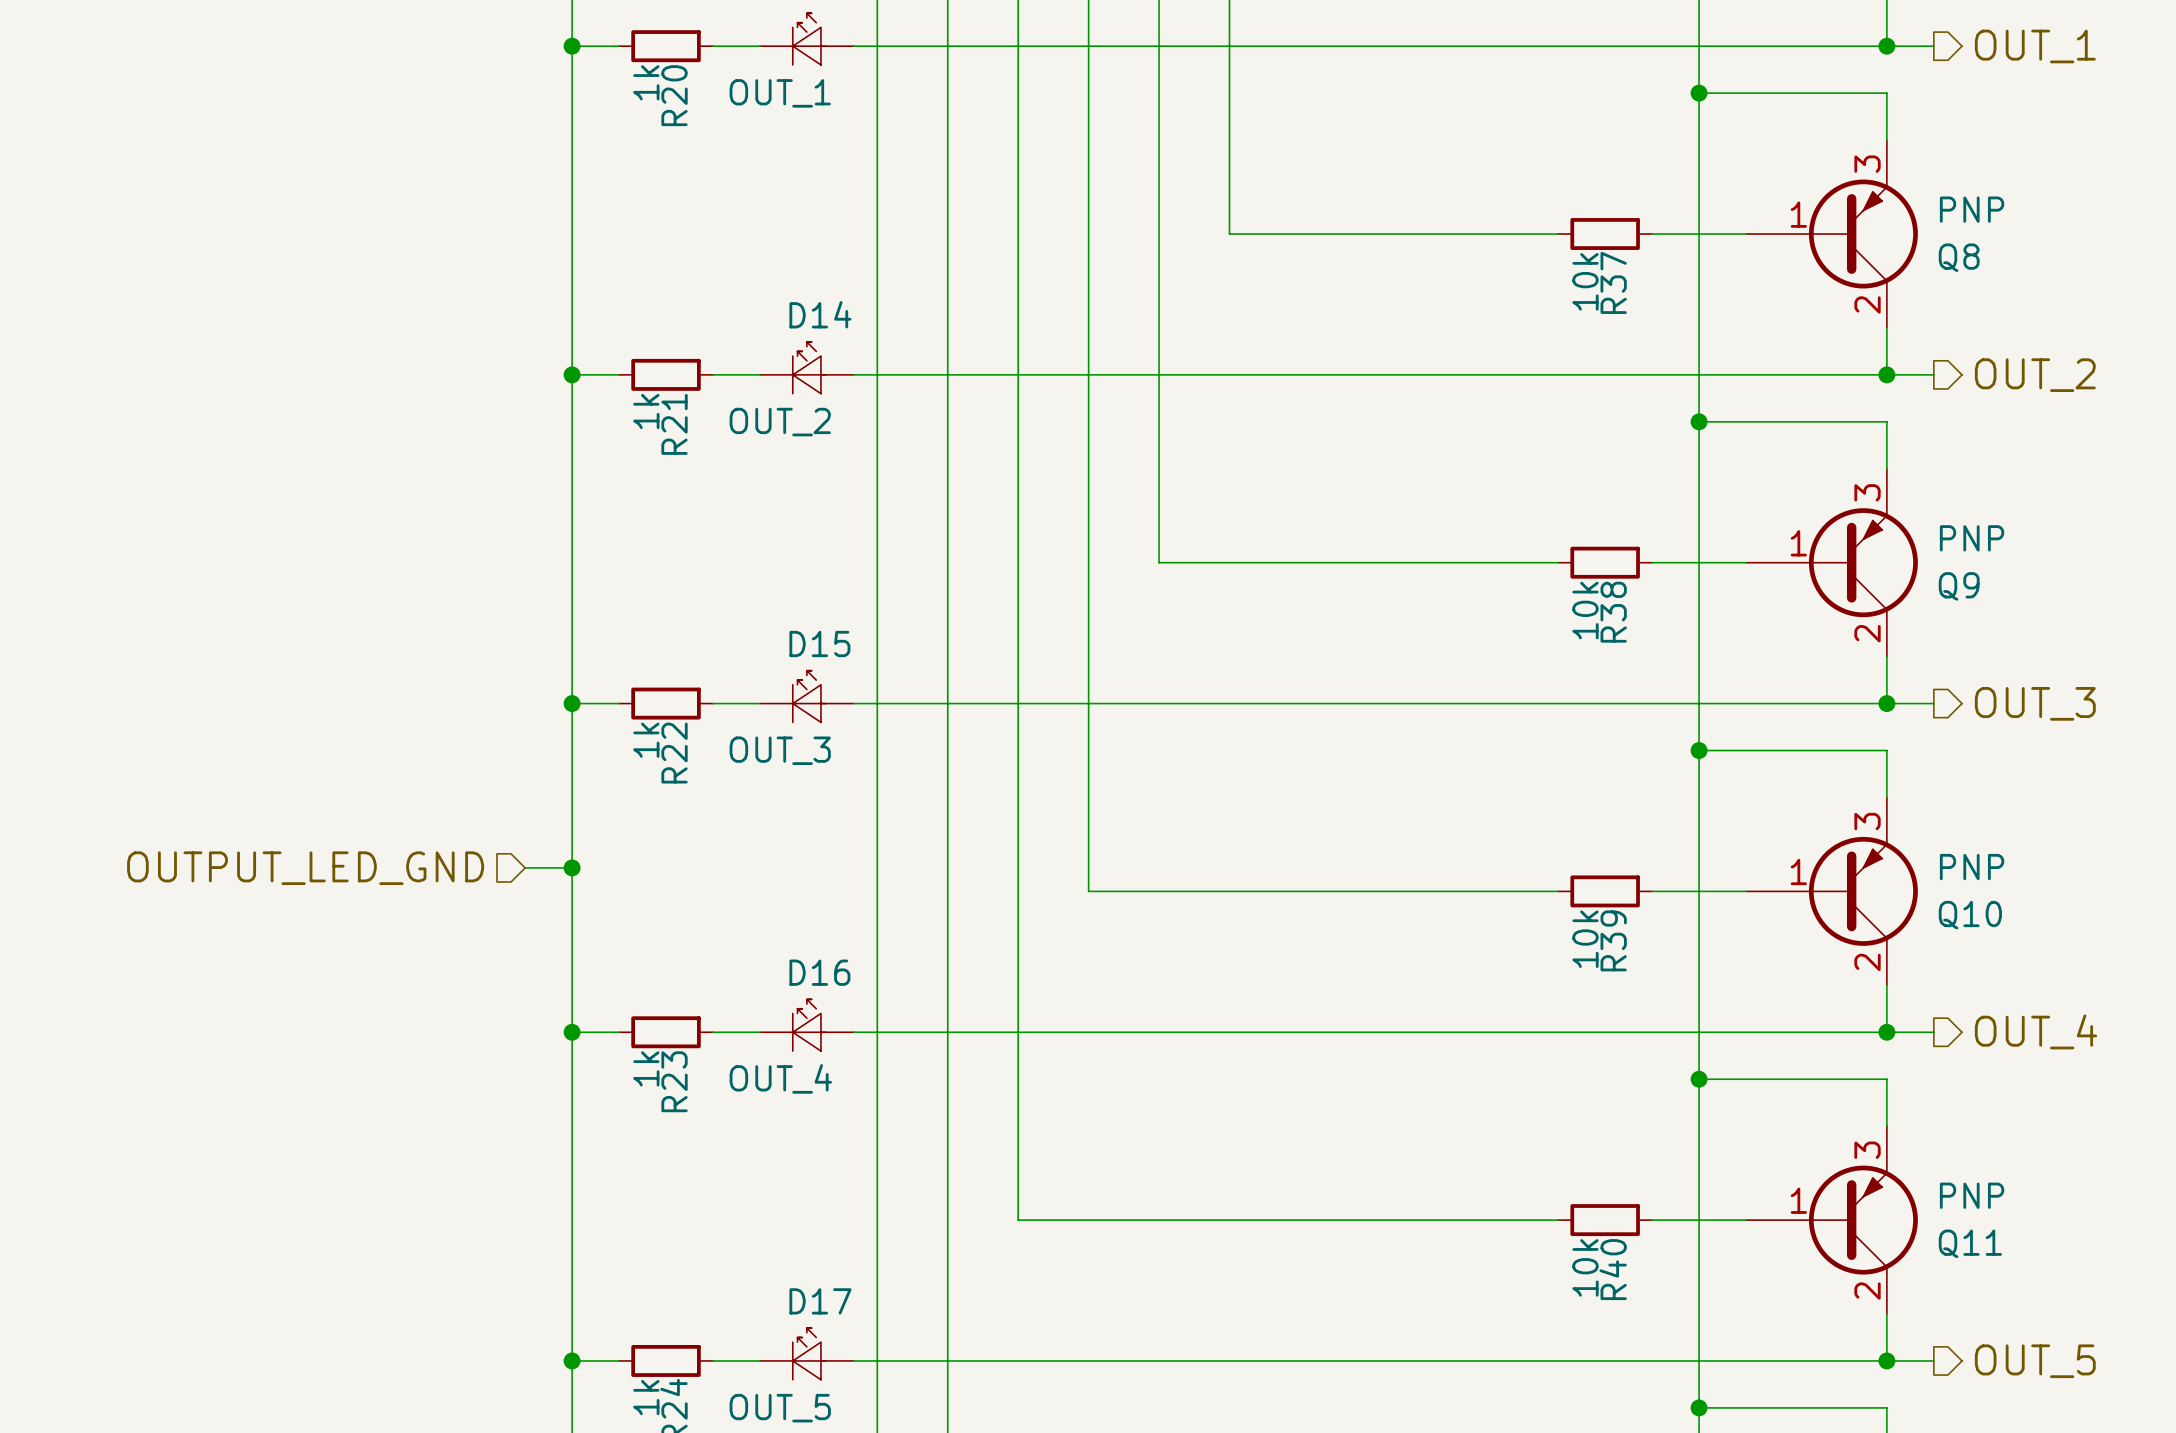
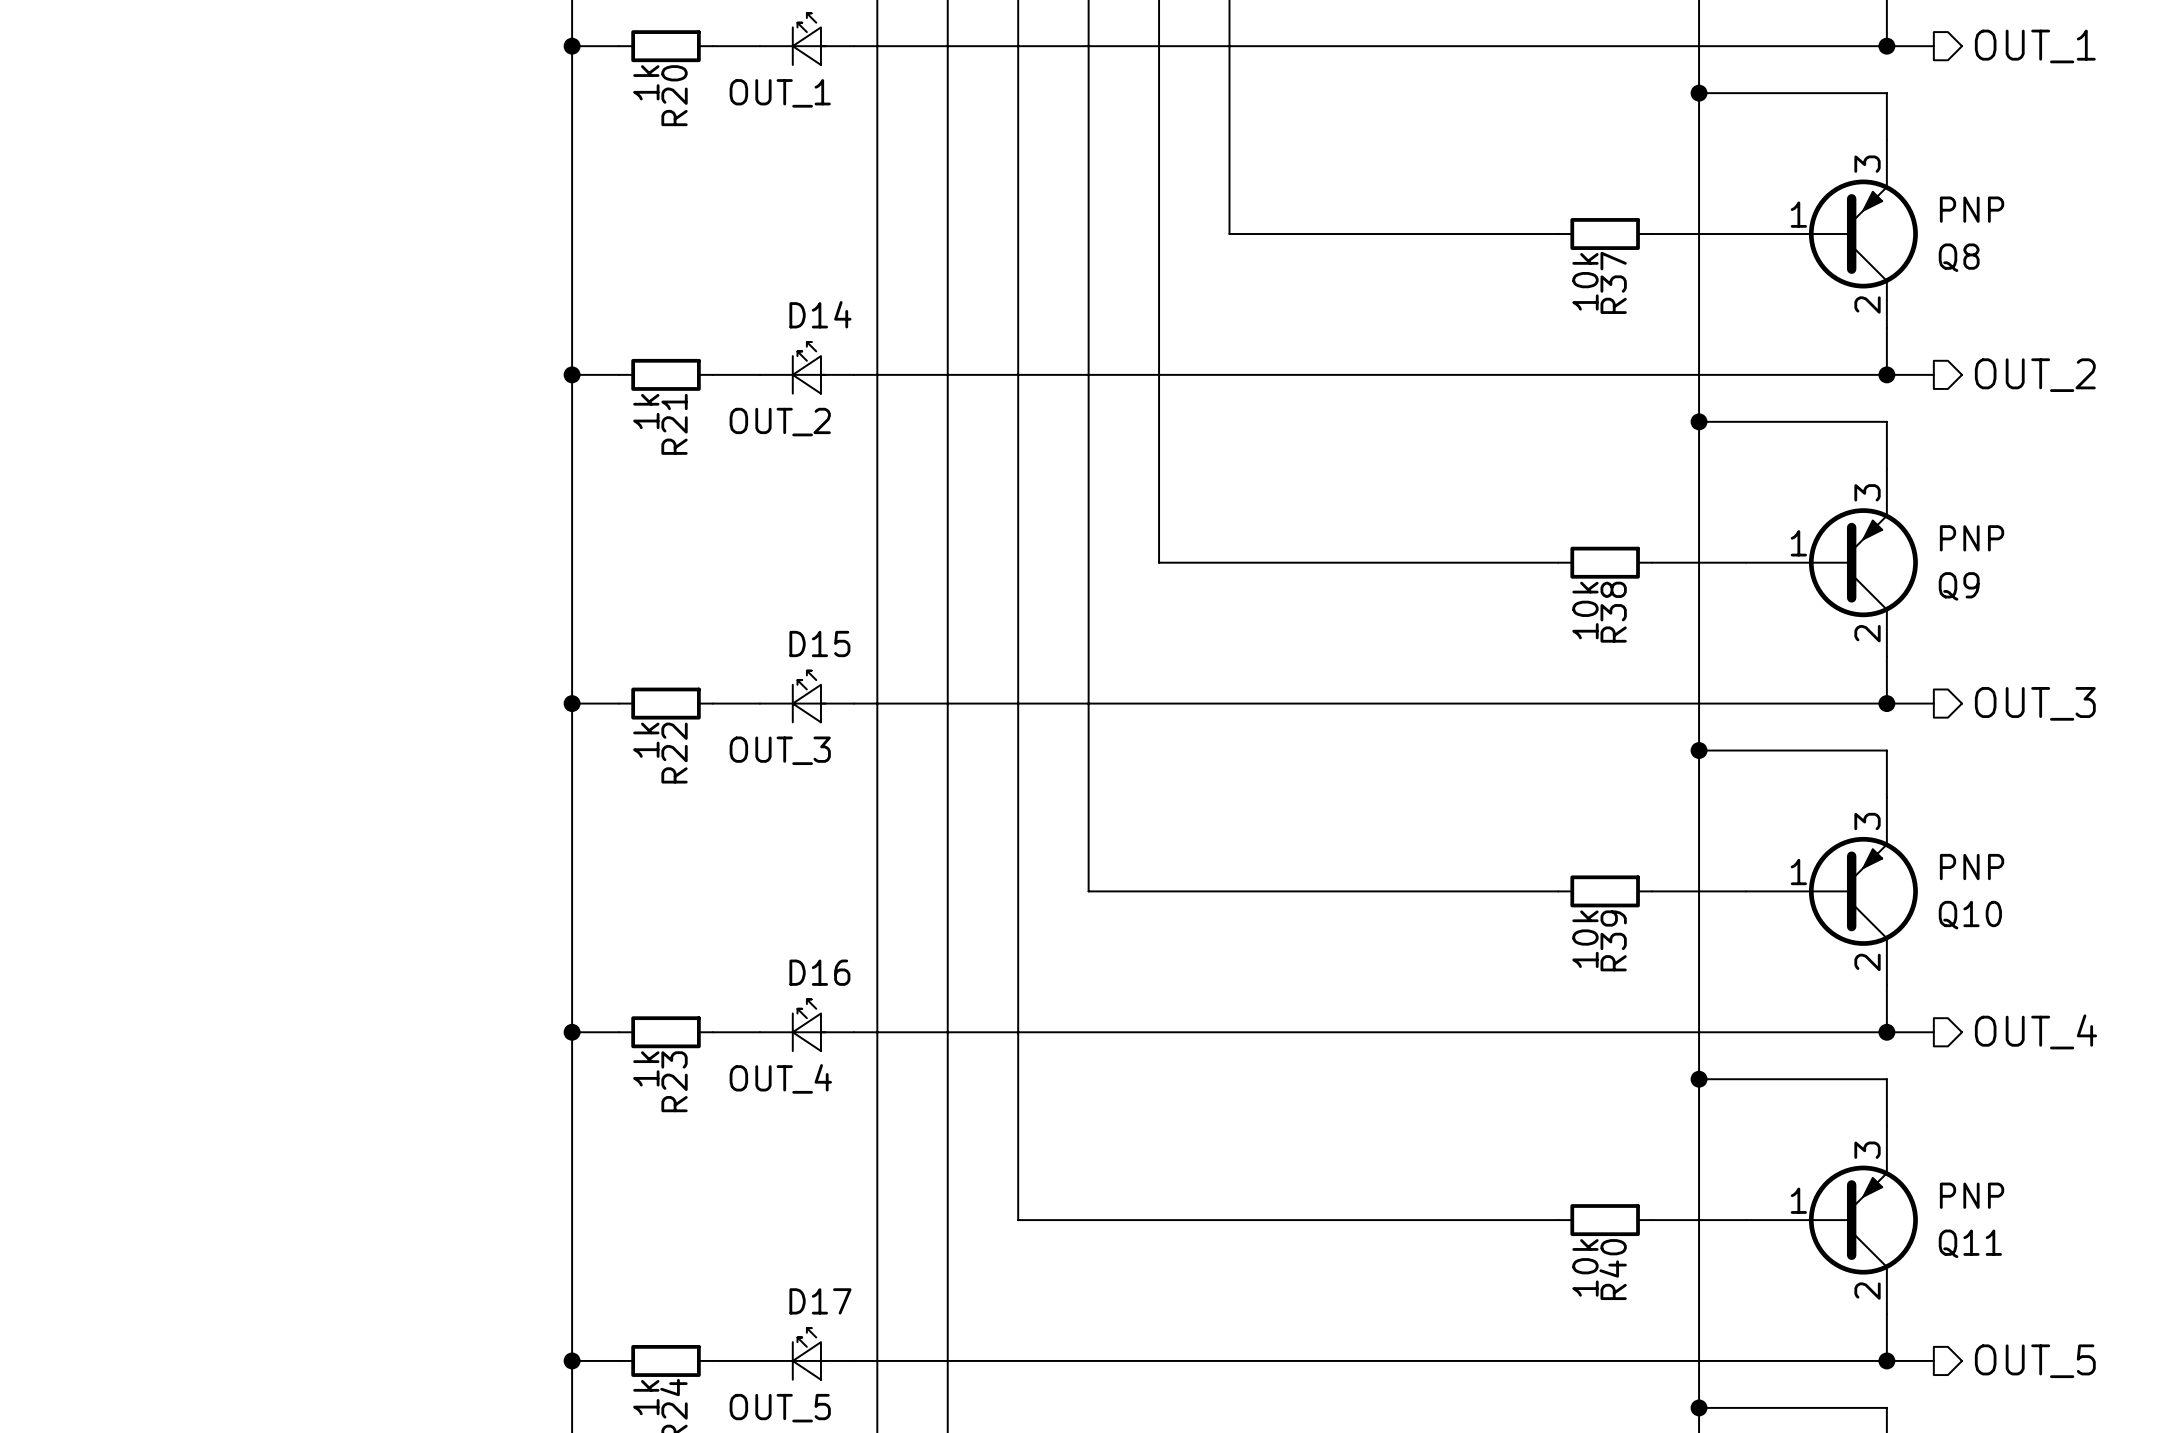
wire: (525, 867) (572, 867) -> none
junction: (572, 867) -> none
hierarchical label: OUTPUT_LED_GND (305, 868) -> none

